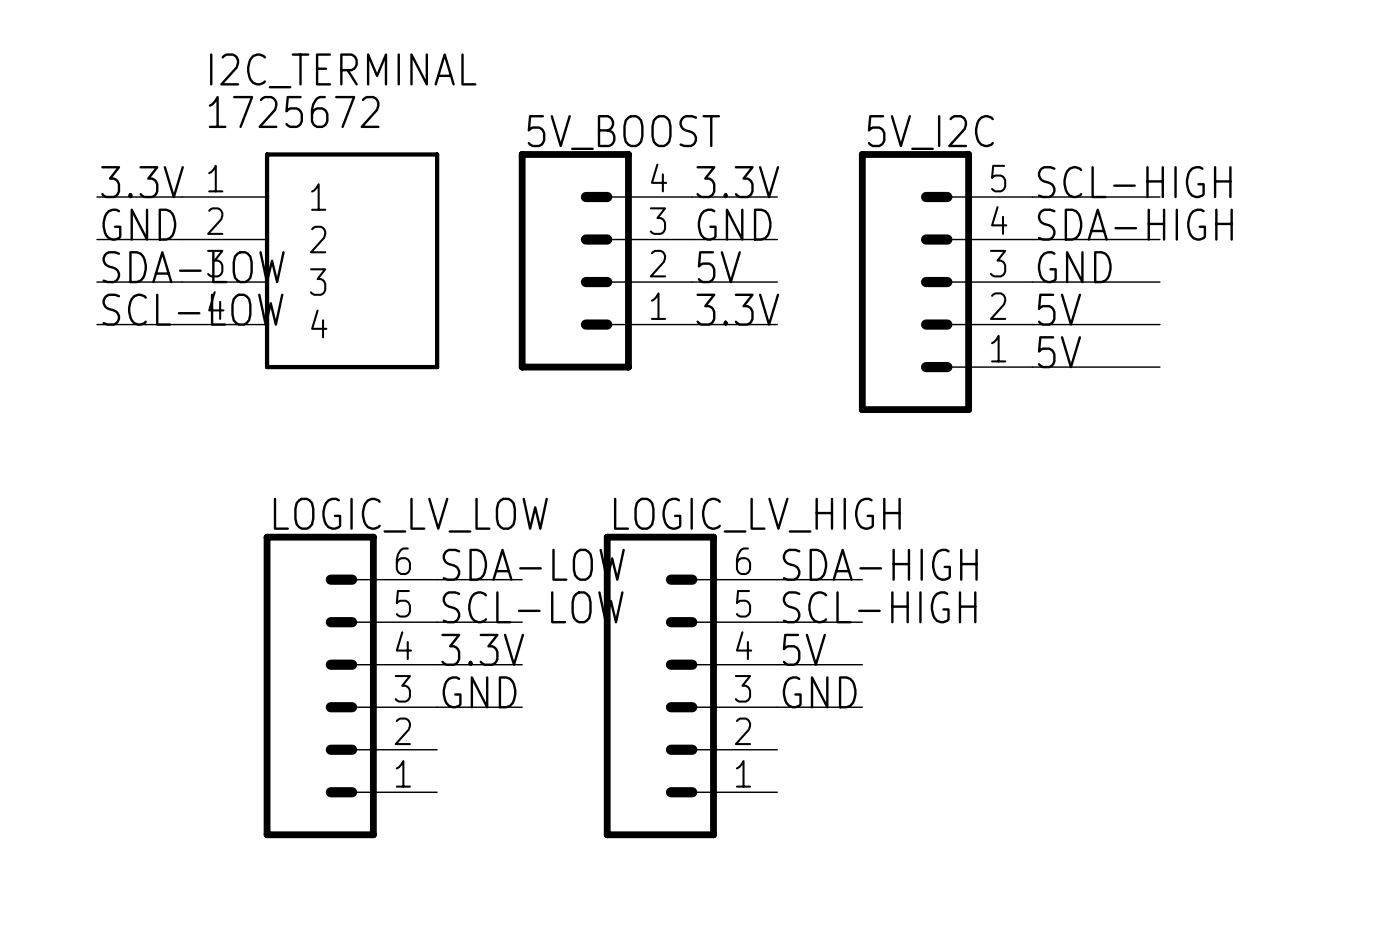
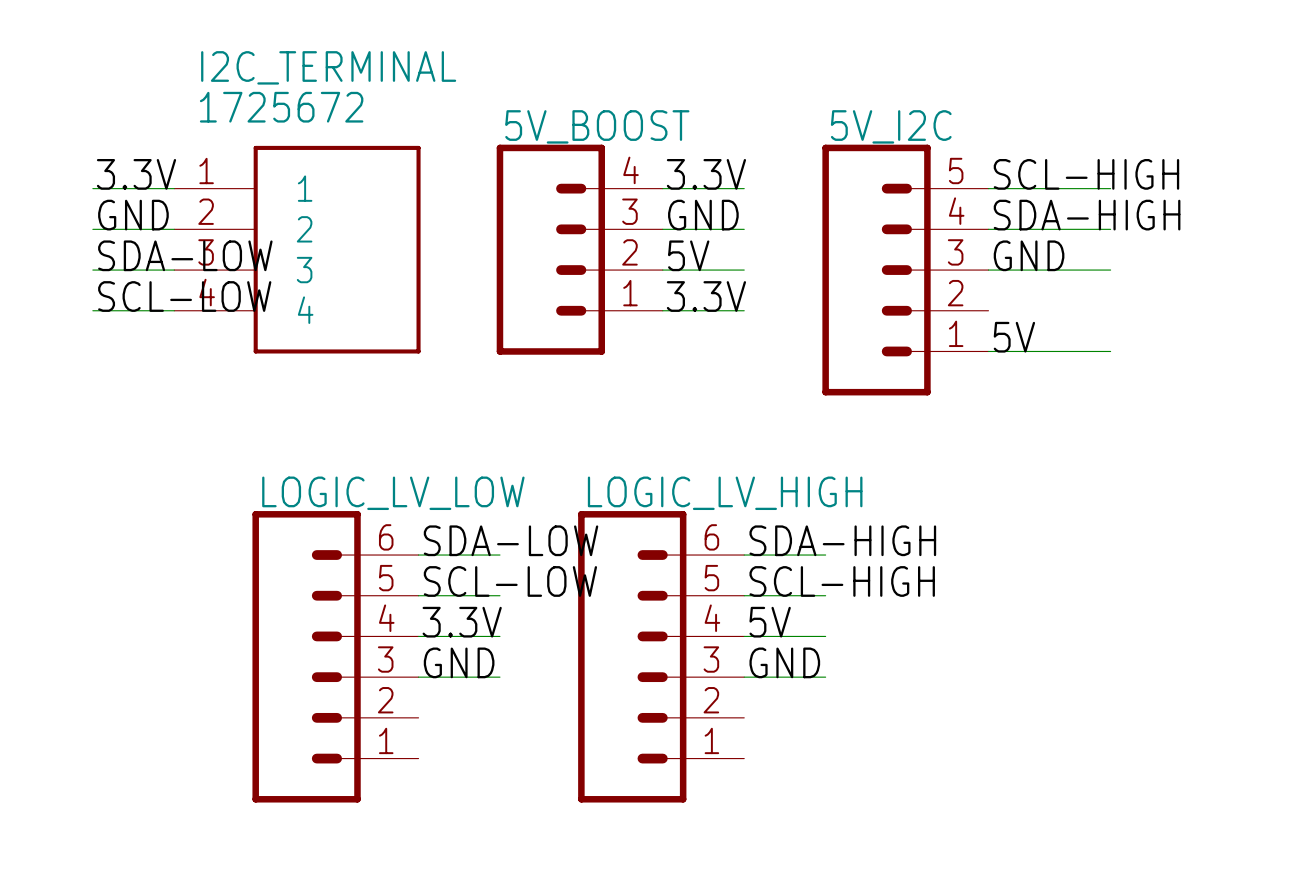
label: 5V (1059, 309) -> none
wire: (1032, 324) (1159, 324) -> none

